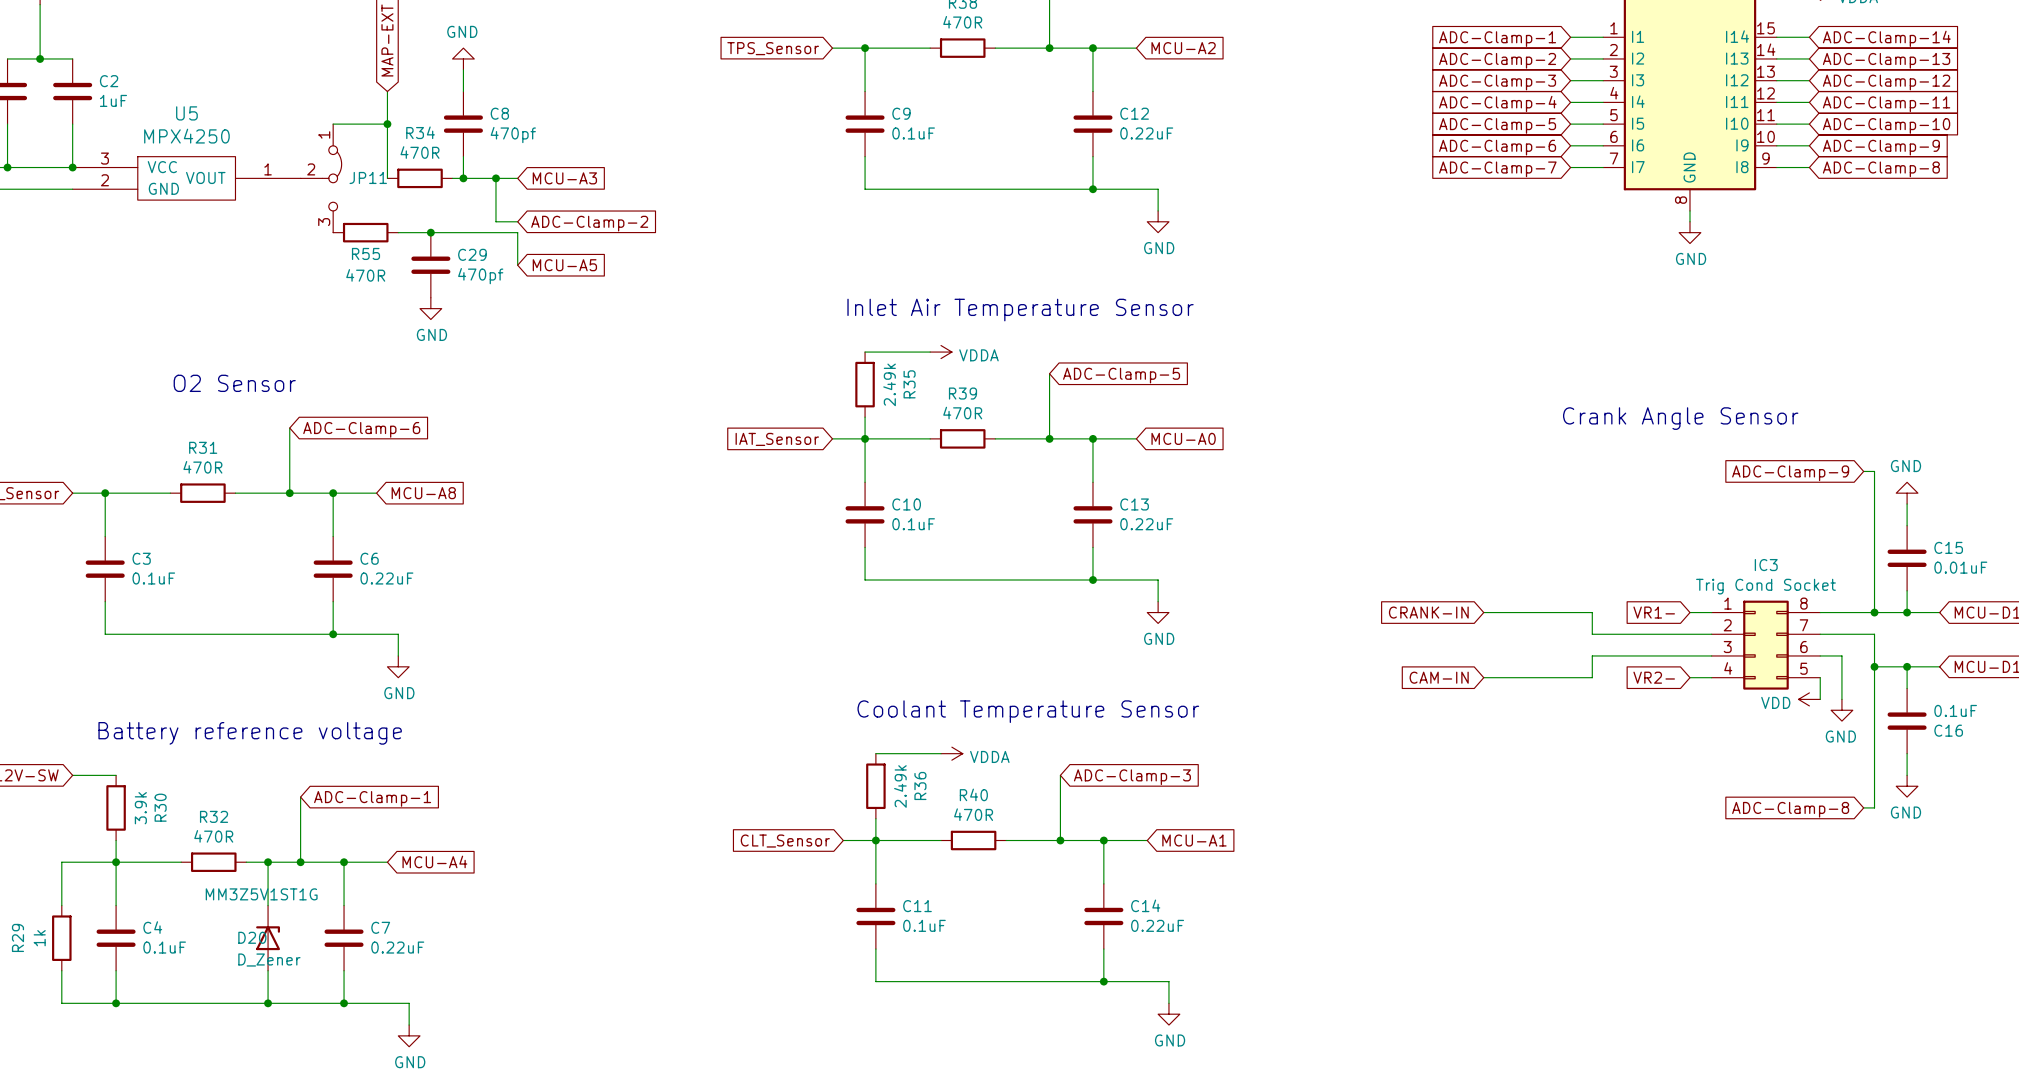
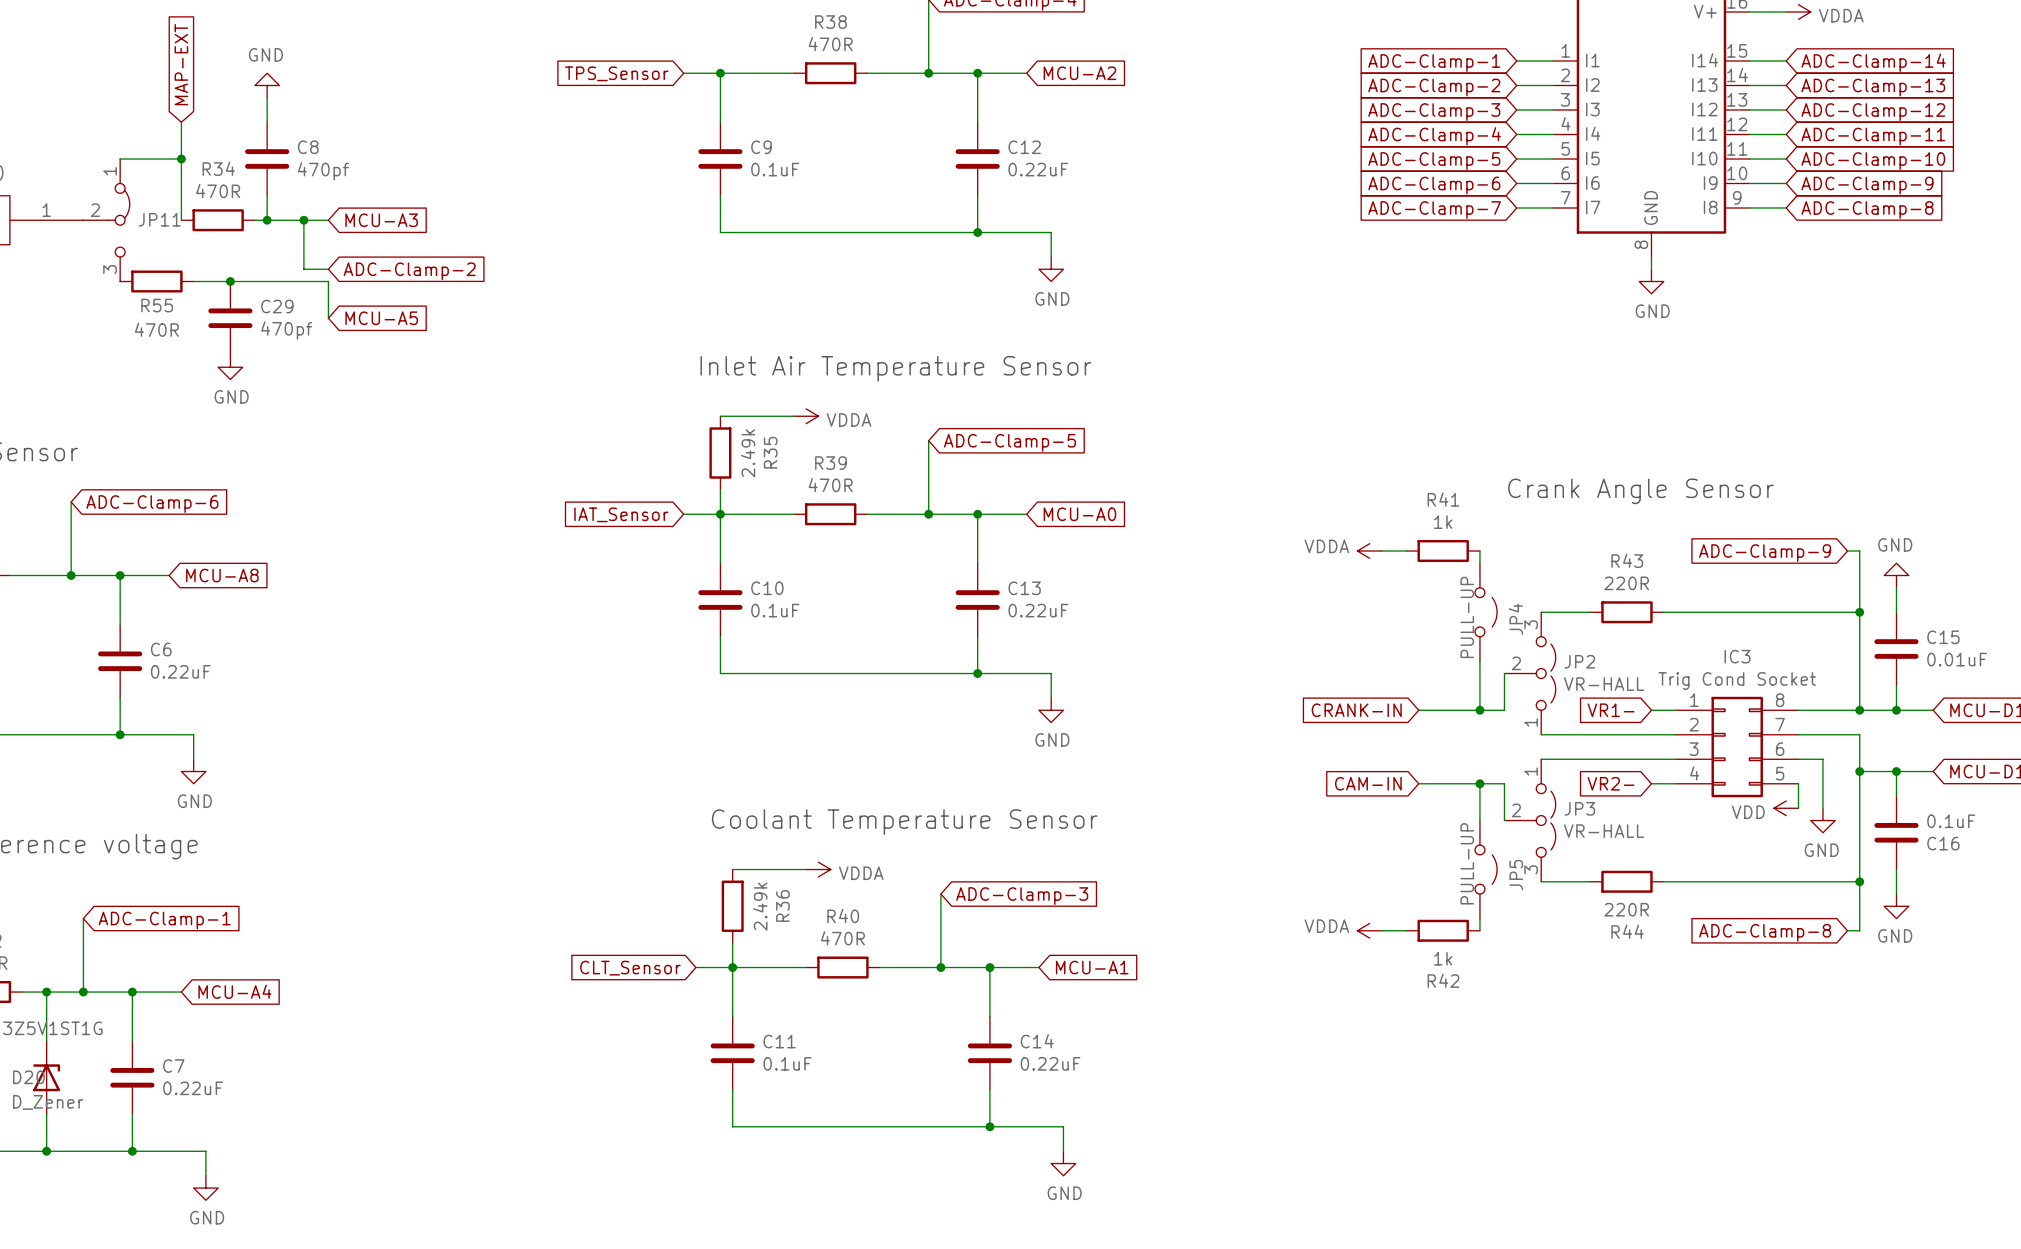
power symbol: none -> VDDA (1369, 551)
wire: none -> (1381, 551) (1406, 551)
R41: none -> 1k (1443, 551)
wire: none -> (1479, 551) (1479, 563)
JP4: none -> PULL-UP (1486, 612)
wire: none -> (1541, 612) (1590, 612)
R43: none -> 220R (1626, 612)
wire: none -> (1663, 612) (1859, 612)
junction: none -> (1859, 612)
wire: none -> (1479, 661) (1479, 710)
JP2: none -> VR-HALL (1530, 673)
junction: none -> (1479, 710)
wire: (1559, 612) (1592, 612) (1592, 634) -> (1504, 710) (1504, 673)
wire: (1592, 655) (1592, 677) (1559, 677) -> (1504, 820) (1504, 783)
wire: none -> (1479, 783) (1479, 820)
junction: none -> (1479, 783)
JP3: none -> VR-HALL (1530, 820)
JP5: none -> PULL-UP (1486, 869)
wire: none -> (1541, 881) (1590, 881)
R44: none -> 220R (1626, 881)
wire: none -> (1663, 881) (1859, 881)
junction: none -> (1859, 881)
wire: none -> (1479, 918) (1479, 930)
power symbol: none -> VDDA (1369, 930)
wire: none -> (1381, 930) (1406, 930)
R42: none -> 1k (1443, 930)

